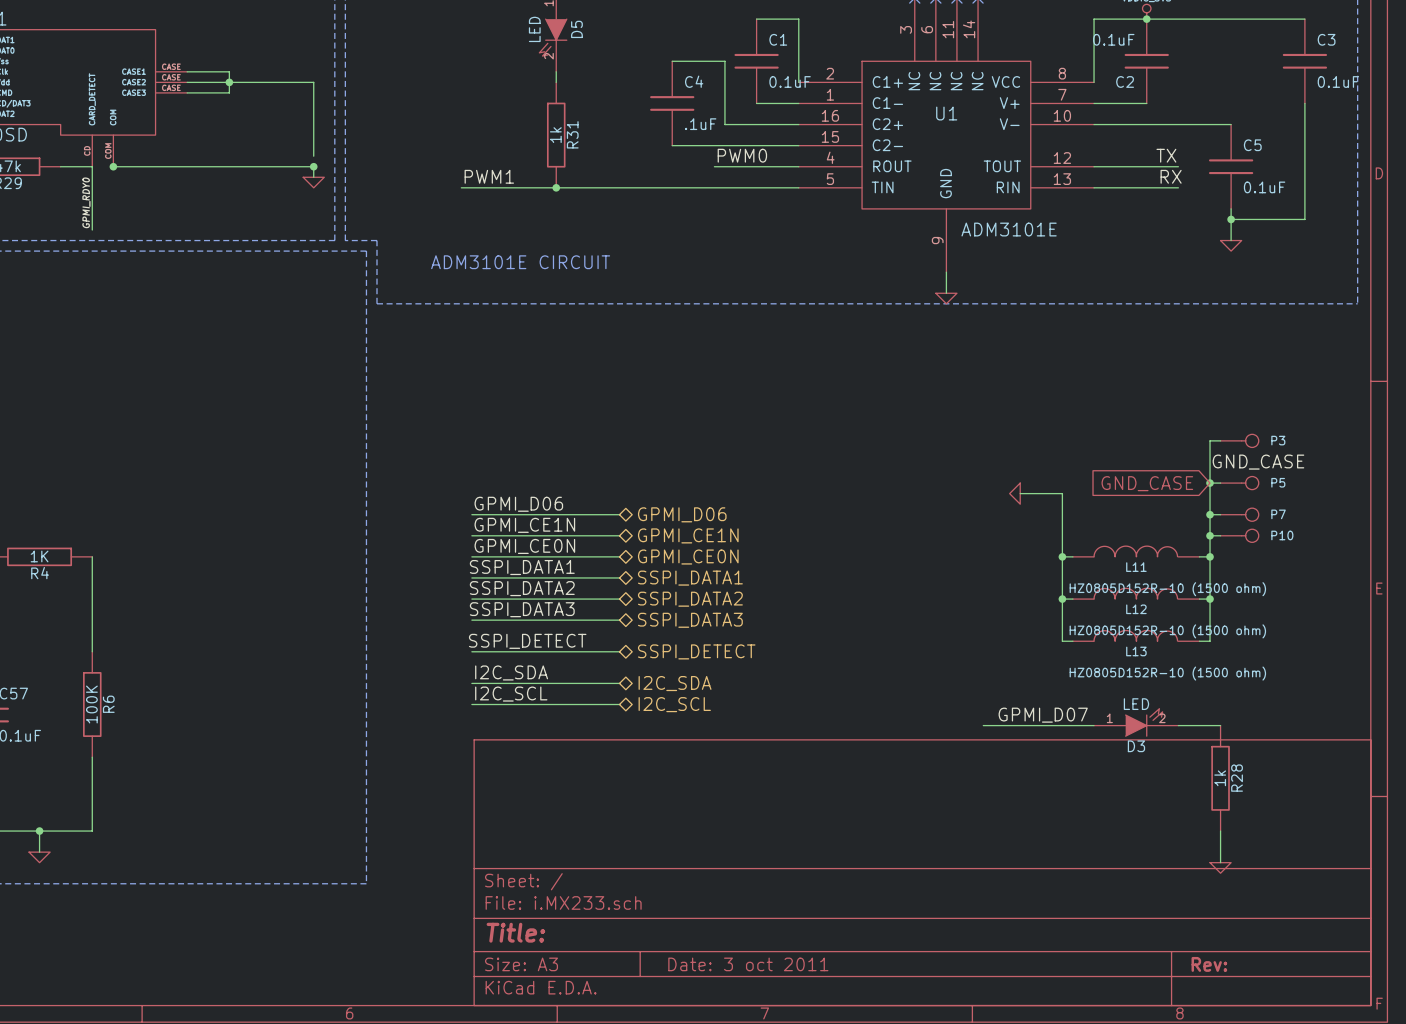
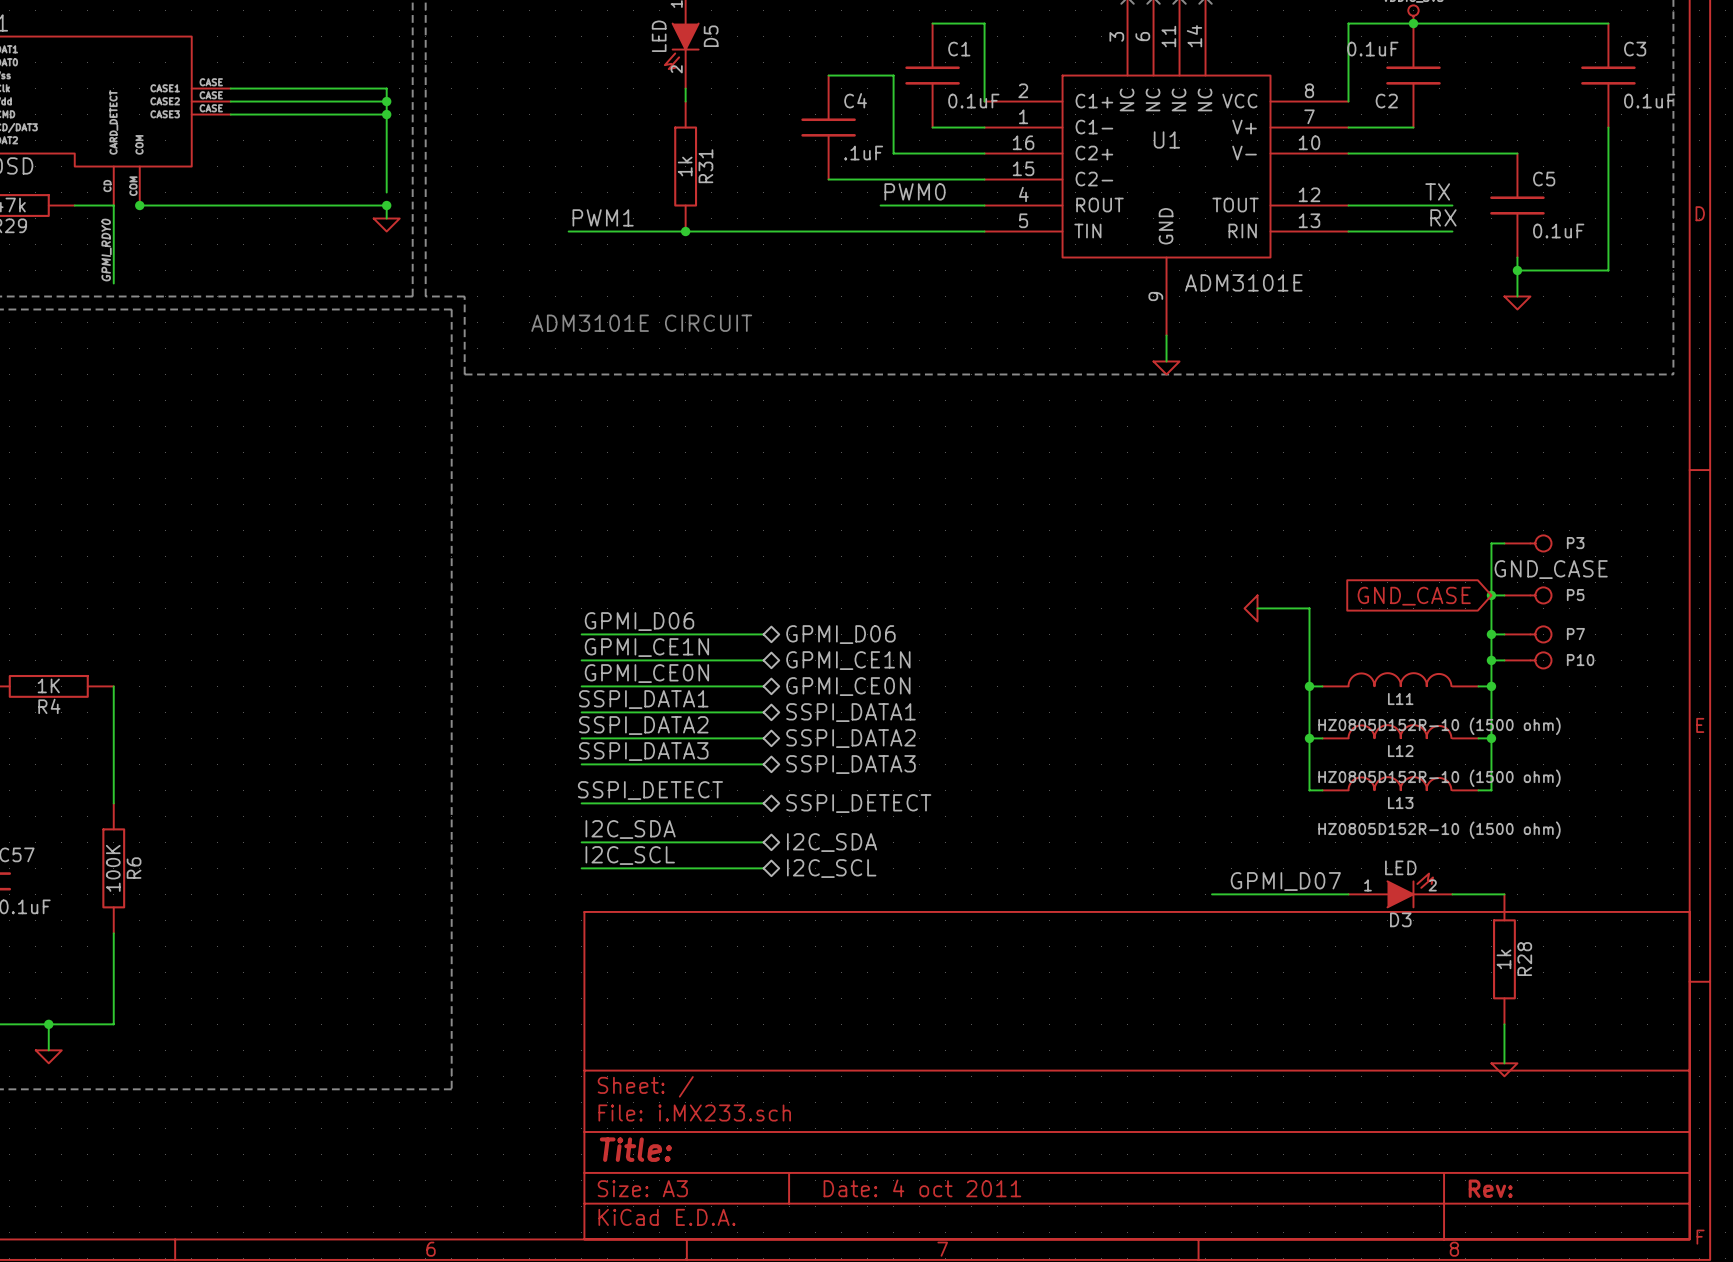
wire: (229, 71) (229, 92) -> (282, 88) (386, 88) (386, 101)
junction: (229, 82) -> none
junction: none -> (386, 101)
wire: none -> (282, 114) (386, 114)
junction: none -> (386, 114)
title block: Date: 3 oct 2011 (748, 964) -> Date: 4 oct 2011 (922, 1188)

